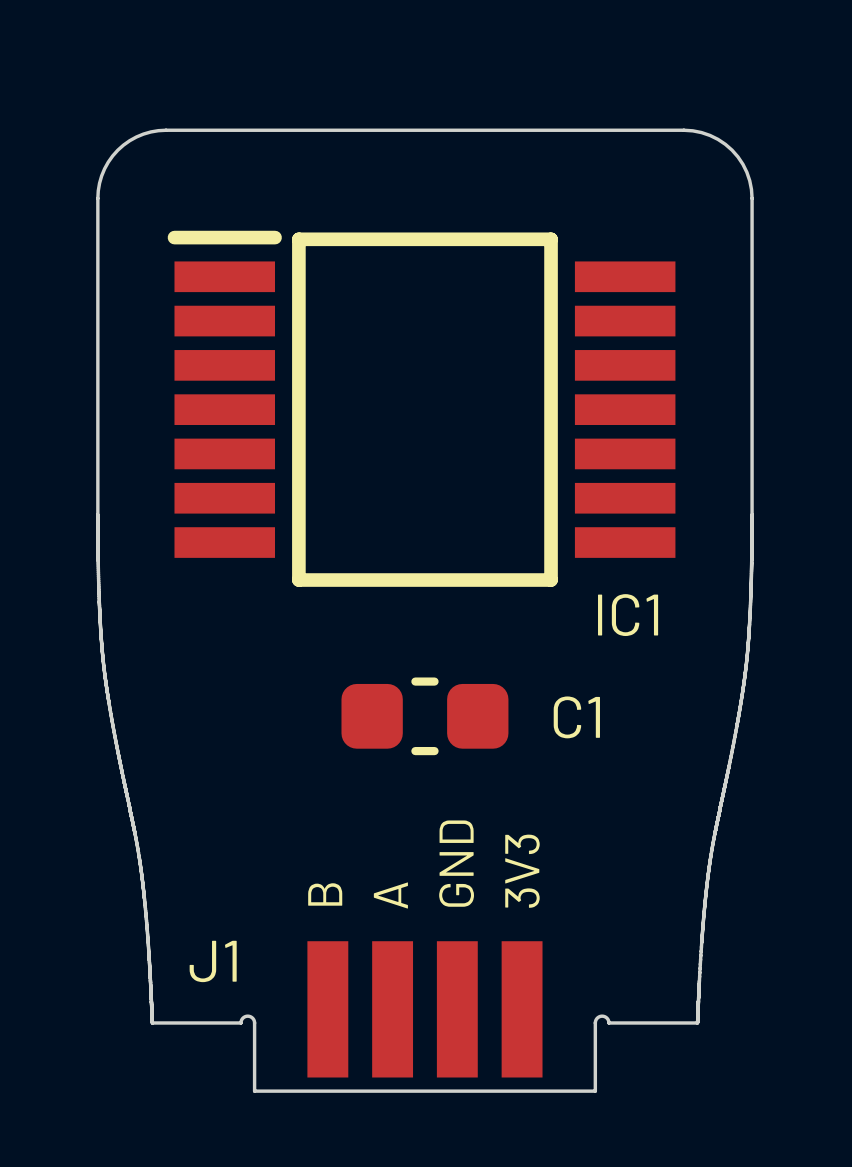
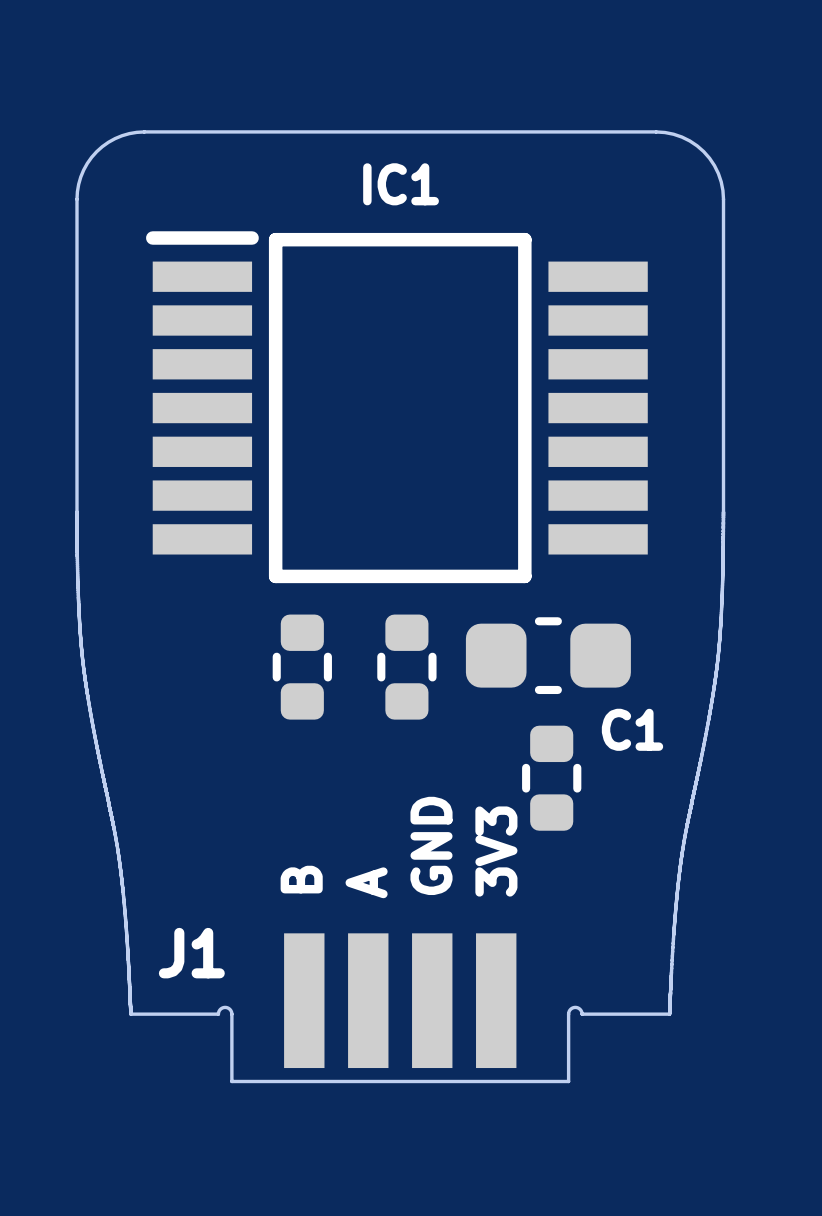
IC1 name position: IC1 (628, 615) -> IC1 (401, 184)
part: none -> (302, 667)
part: none -> (406, 667)
C1 position: (424, 716) -> (548, 655)
C1 name position: C1 (576, 717) -> C1 (632, 729)
part: none -> (551, 778)

